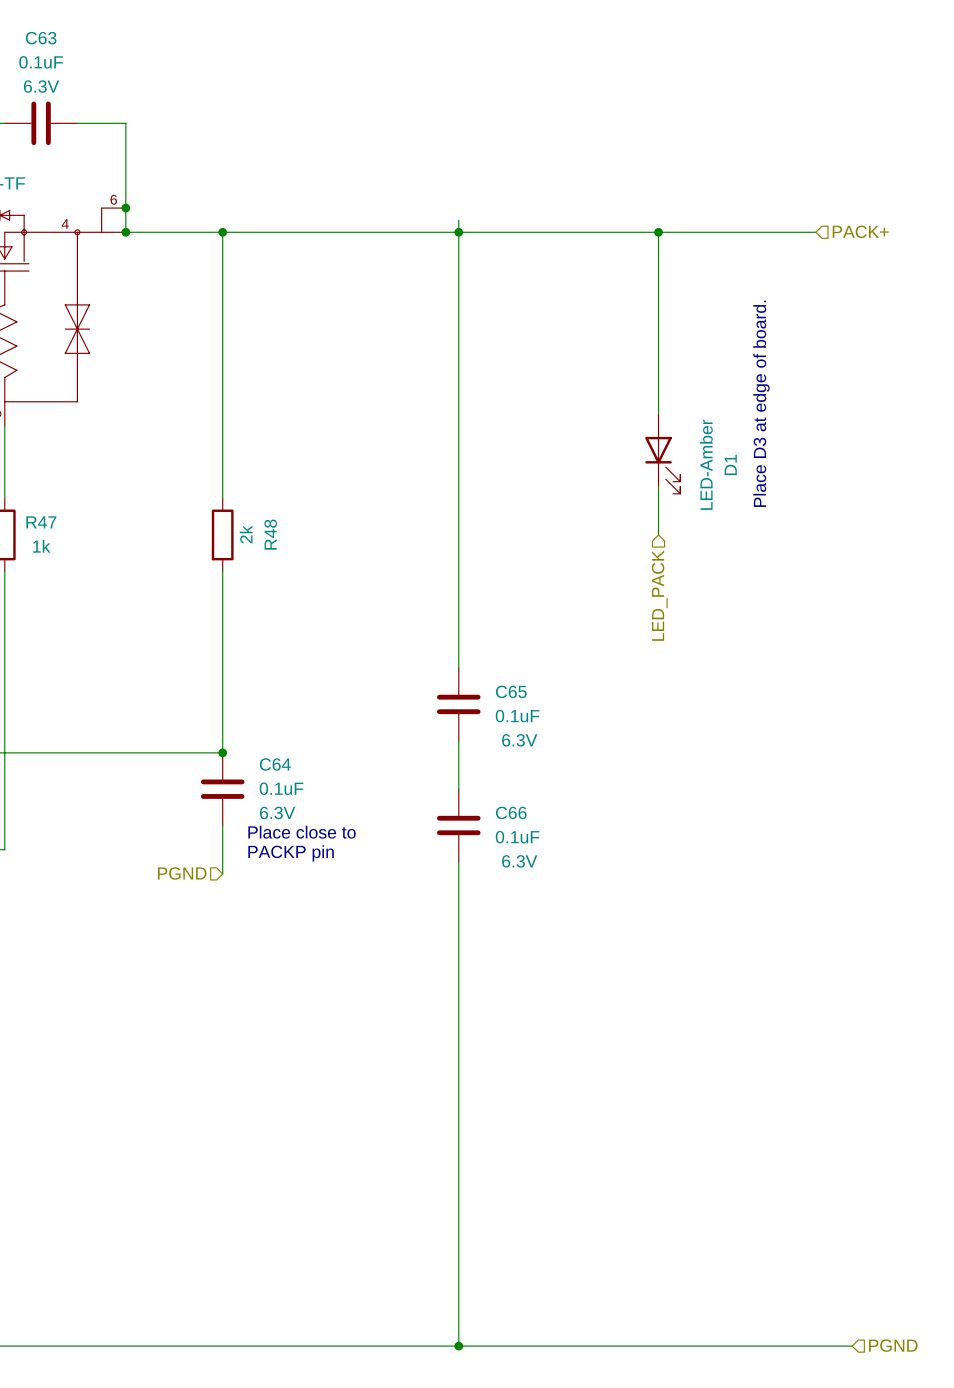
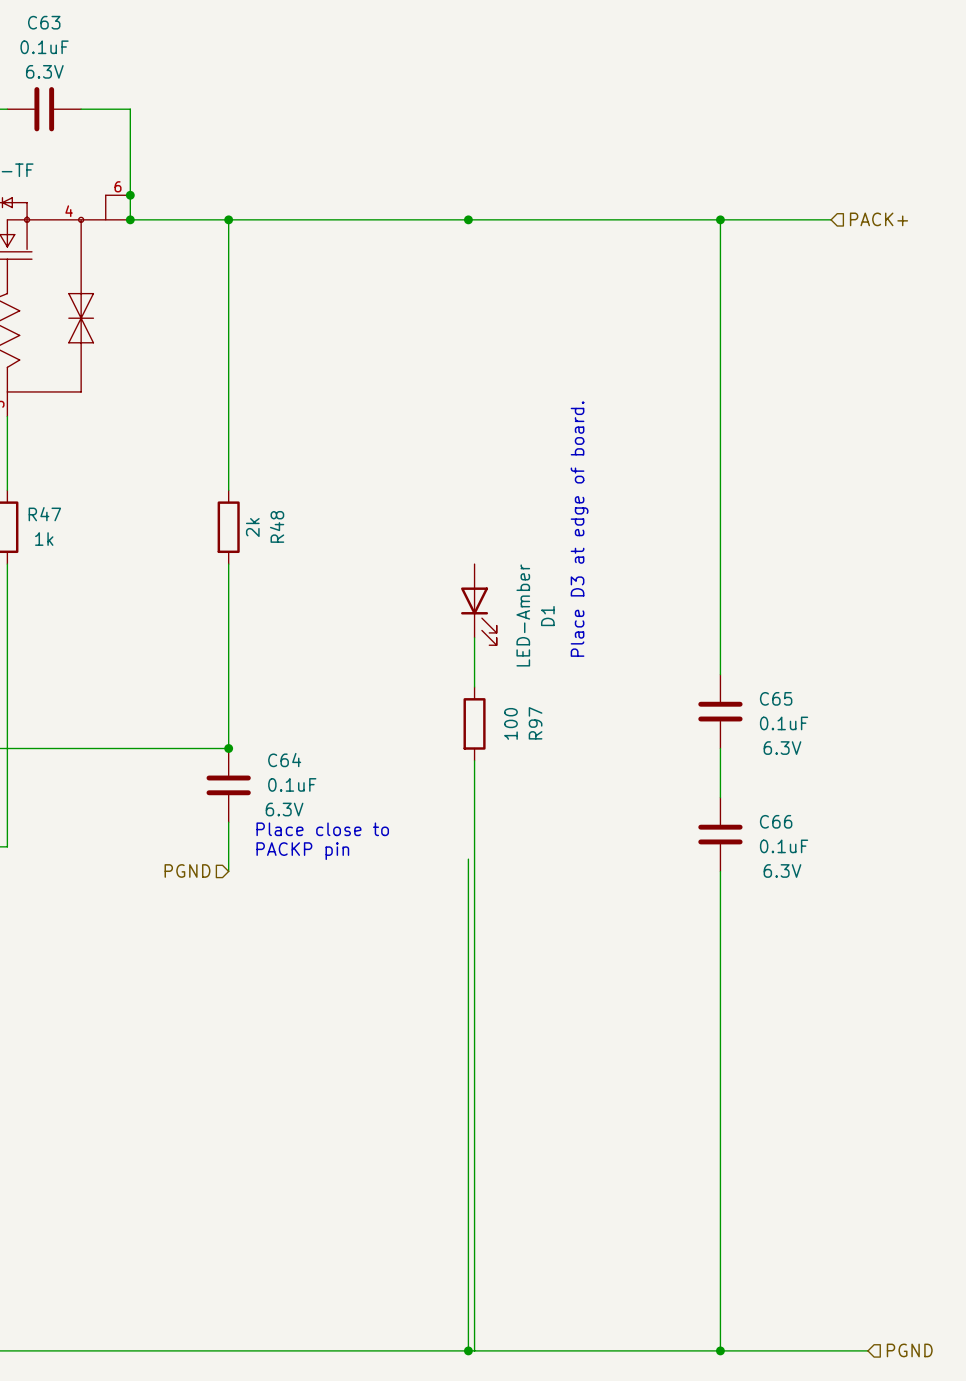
wire: (458, 220) (458, 668) -> none
wire: (658, 232) (658, 413) -> none
junction position: (658, 232) -> (720, 219)
wire: none -> (720, 219) (720, 674)
text: Place D3 at edge of board. (761, 403) -> none
D1 position: (662, 453) -> (478, 604)
wire: (658, 486) (658, 534) -> none
text: none -> Place D3 at edge of board. (579, 529)
hierarchical label: LED_PACK (659, 595) -> none
C65 position: (458, 704) -> (720, 711)
R97: none -> 100 (474, 723)
wire: (458, 740) (458, 789) -> (474, 637) (474, 687)
wire: none -> (720, 748) (720, 797)
wire: none -> (474, 760) (474, 1350)
C66 position: (458, 825) -> (720, 834)
wire: none -> (720, 871) (720, 1350)
junction: none -> (720, 1350)

